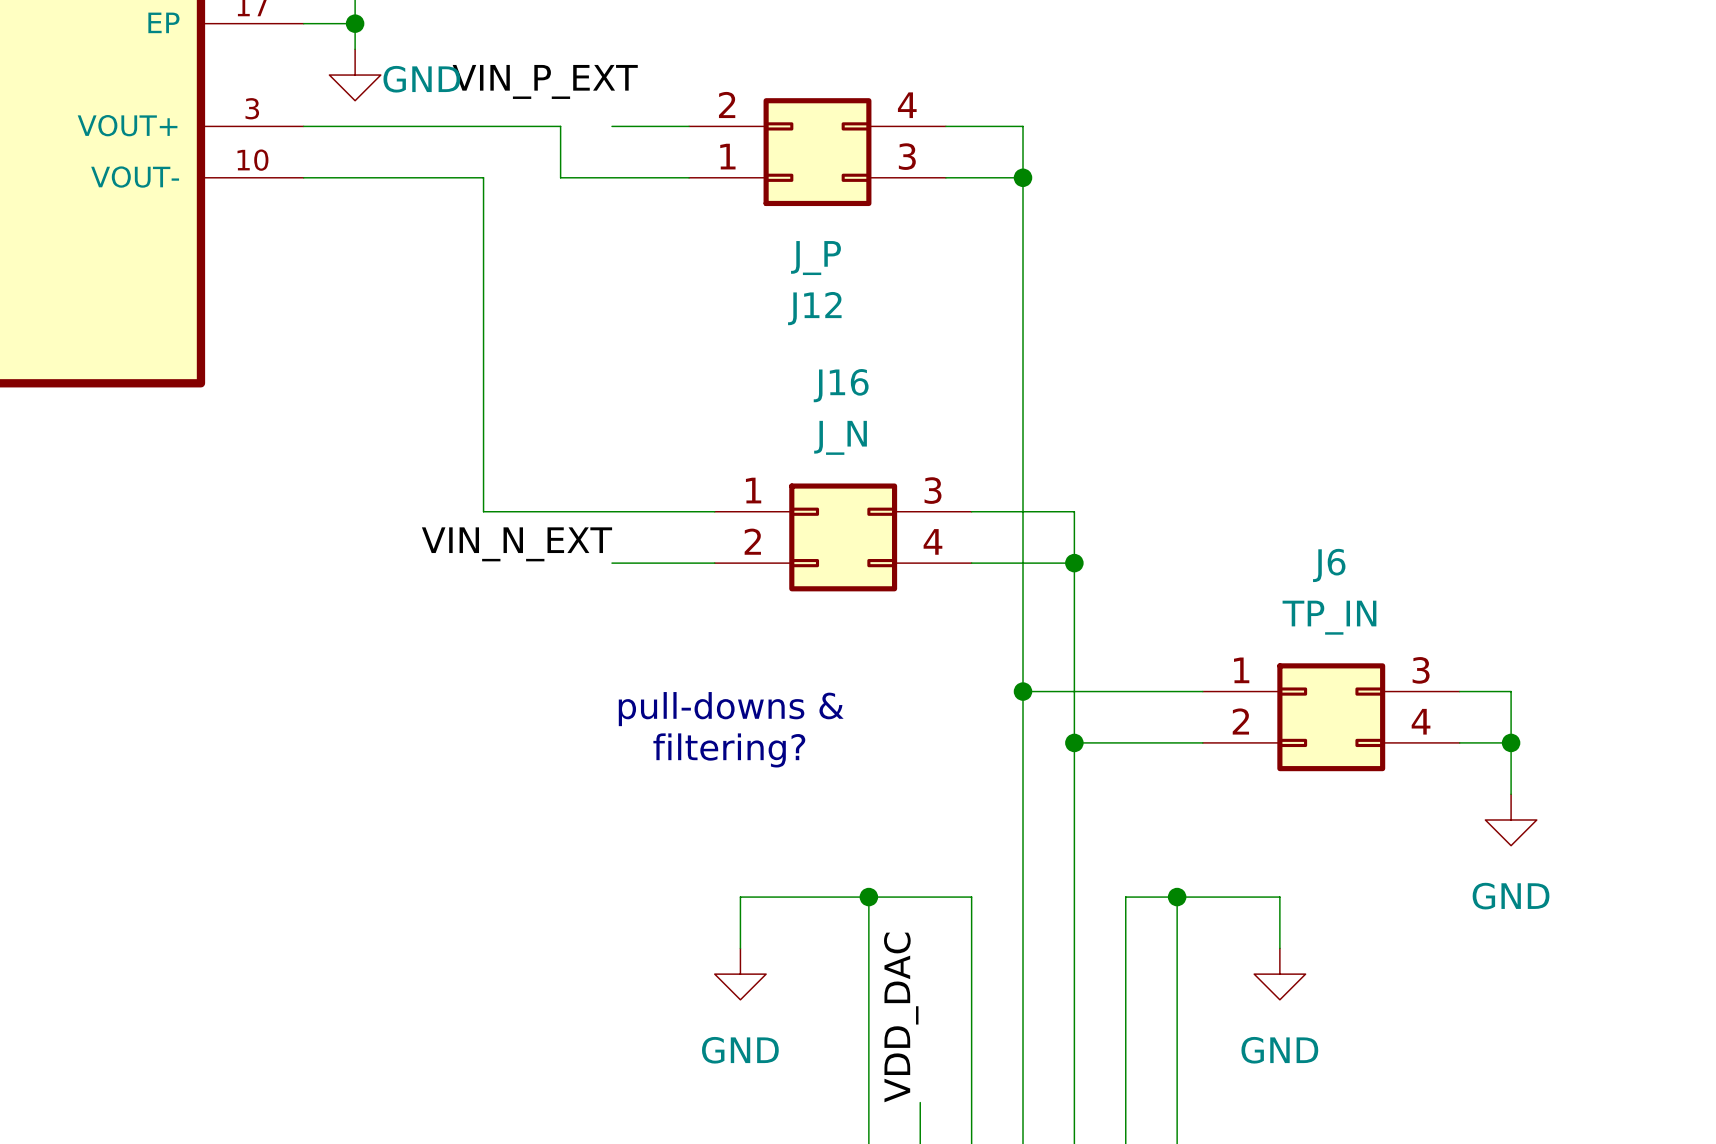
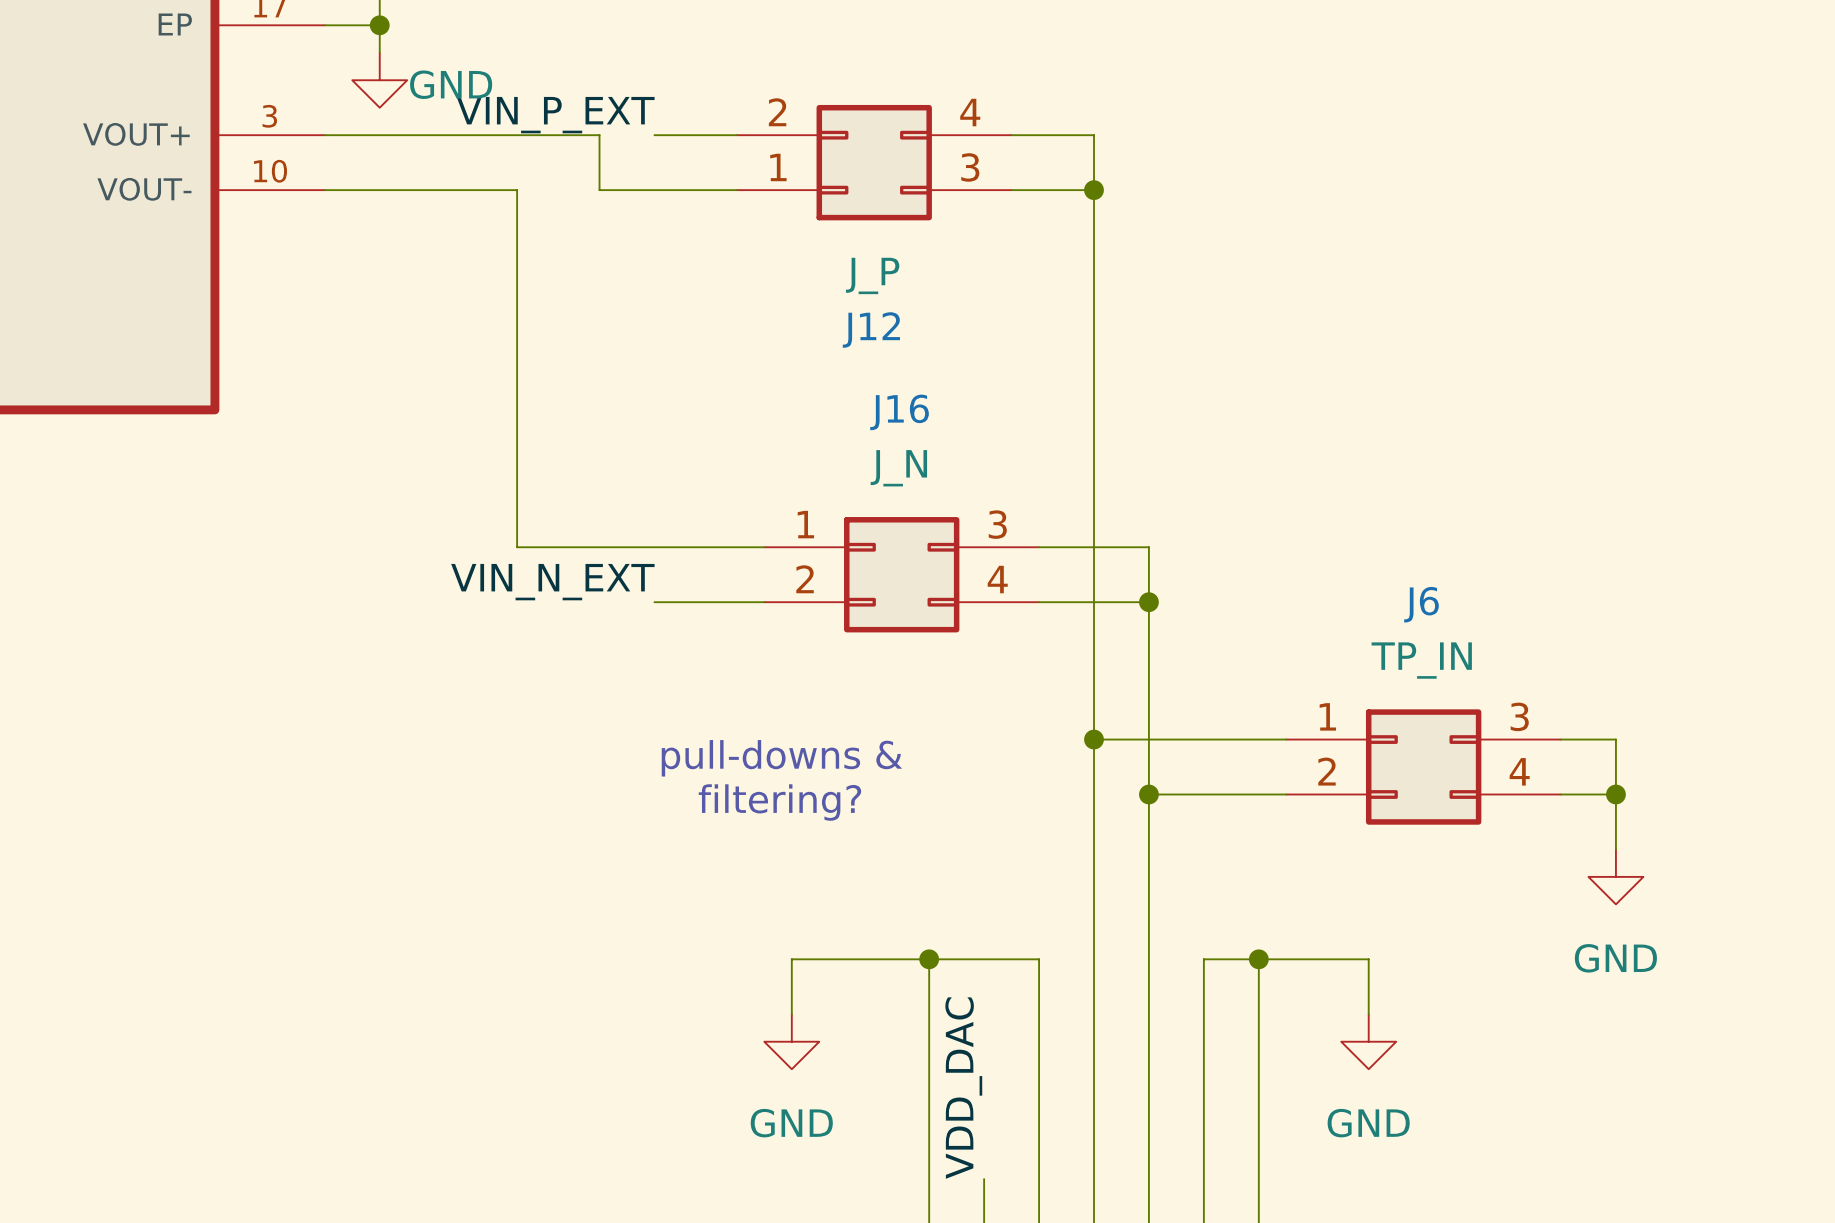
label position: VIN_P_EXT (545, 81) -> VIN_P_EXT (555, 115)

